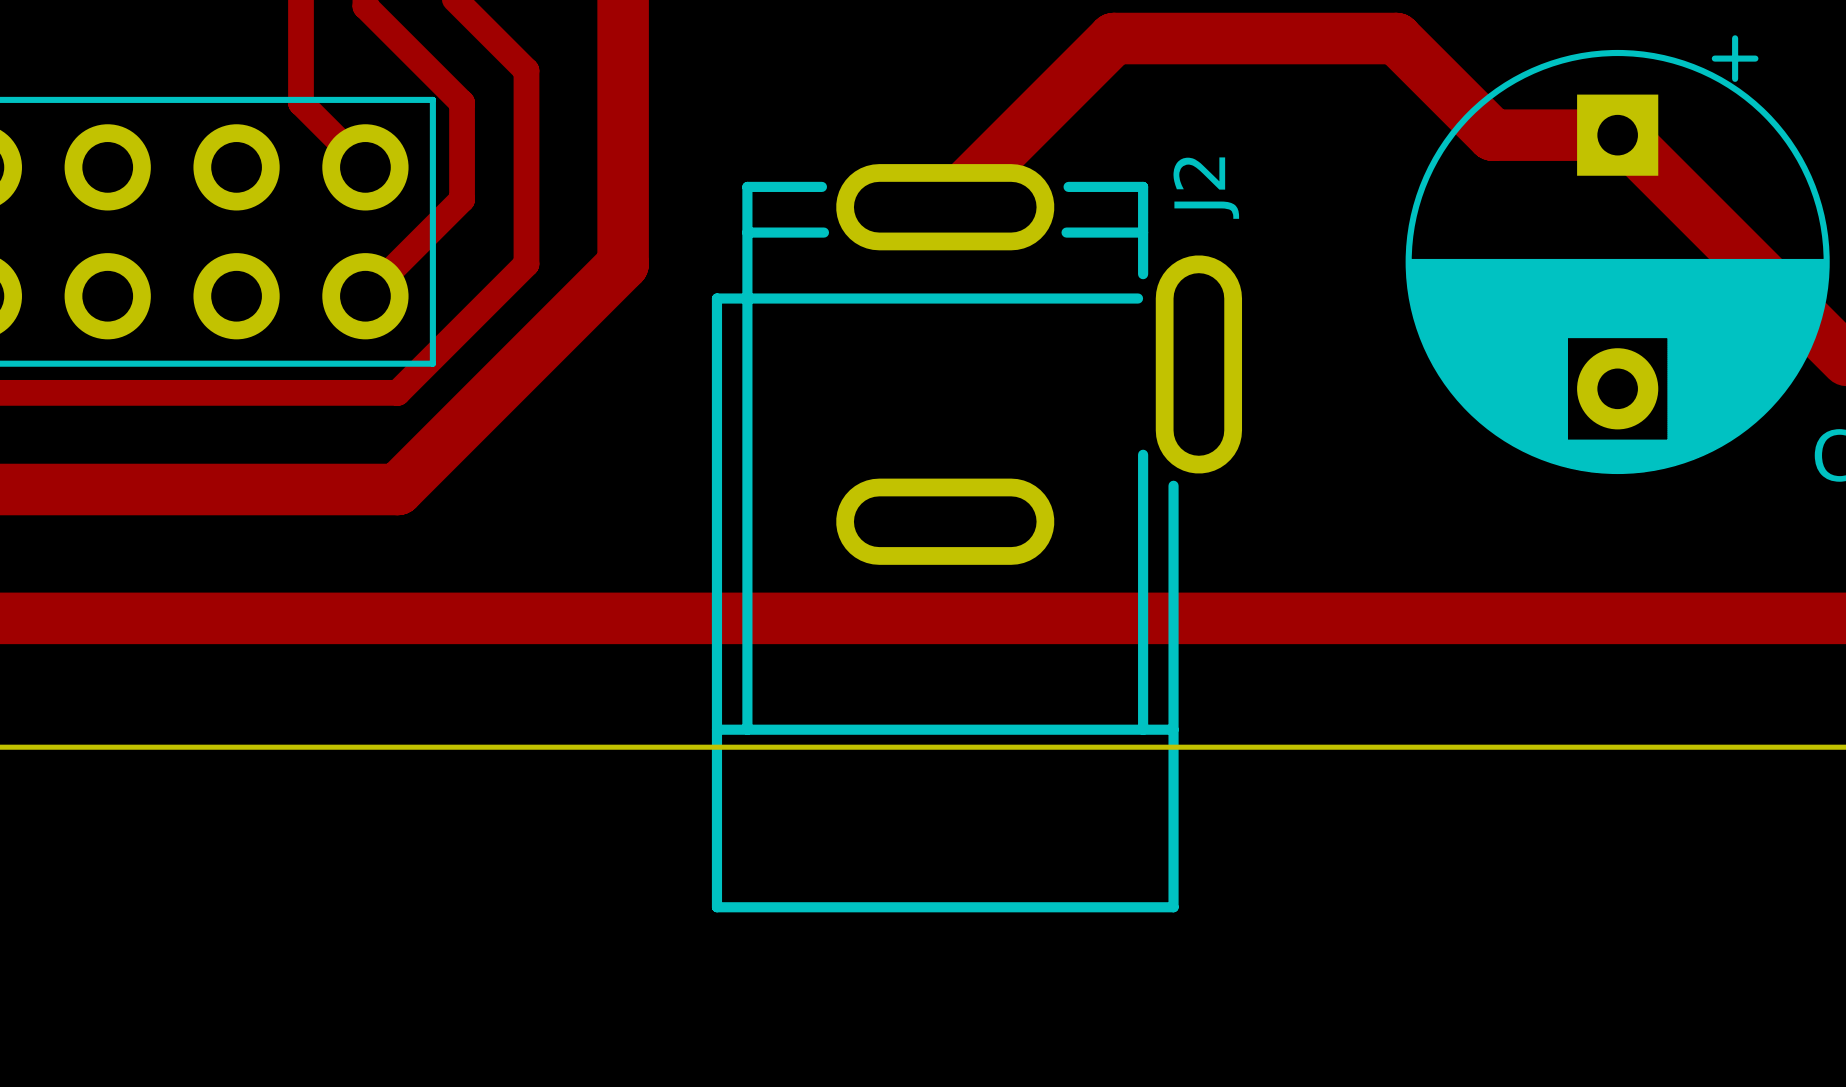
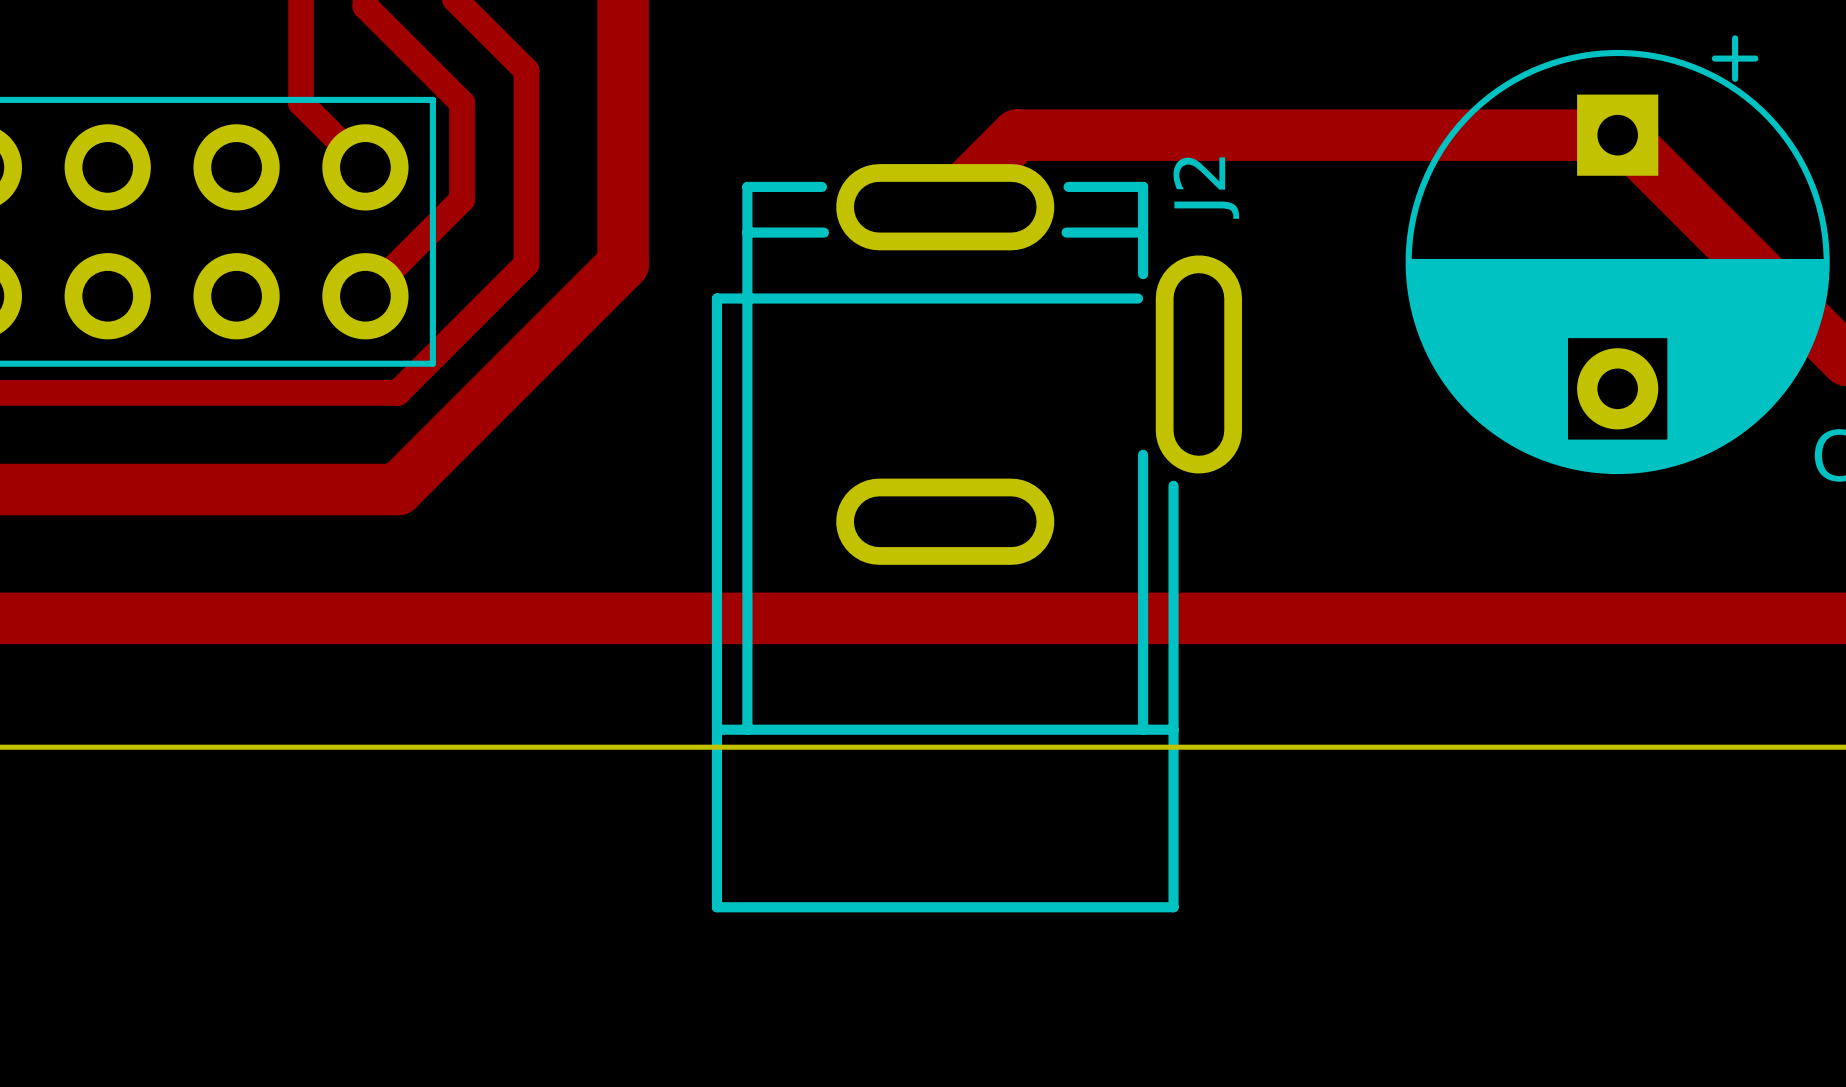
track: (1017, 135) (1113, 38) (1396, 38) (1492, 135) -> (1017, 135) (1492, 135)

